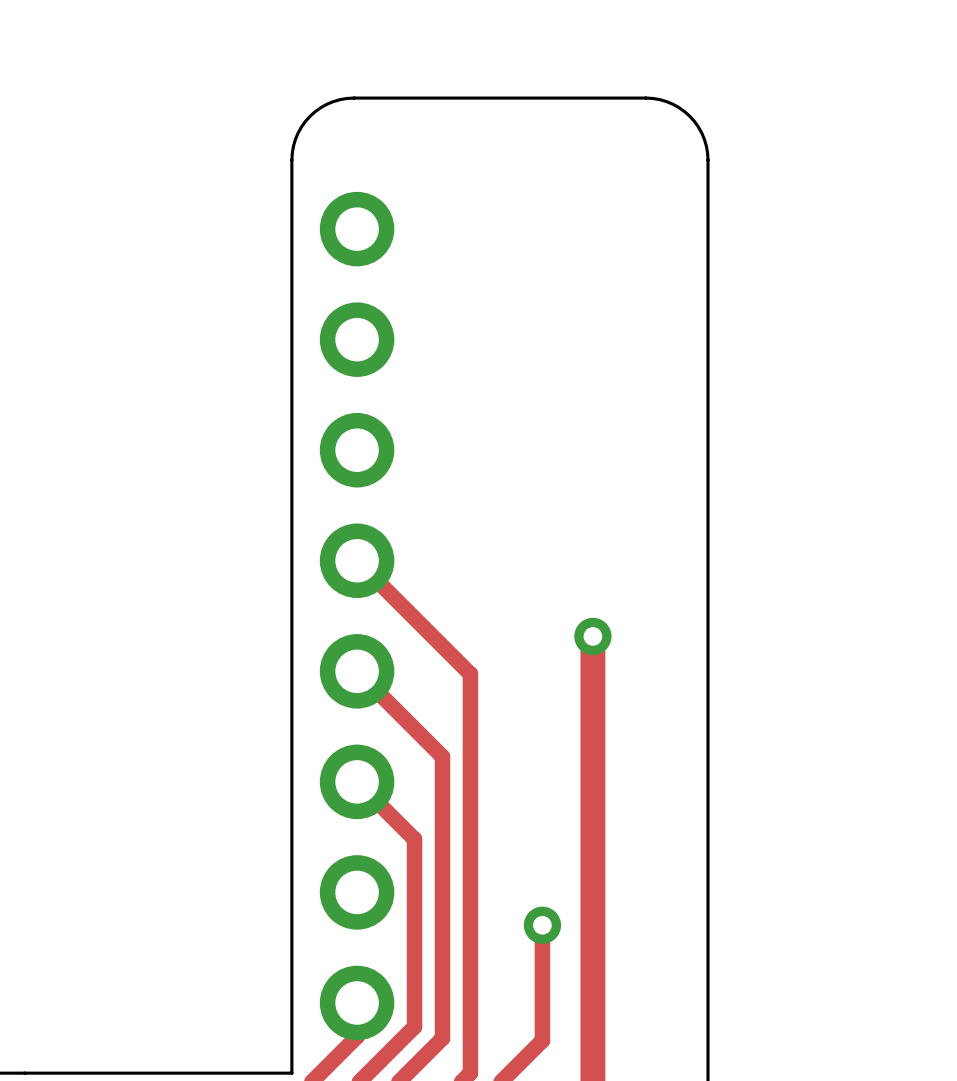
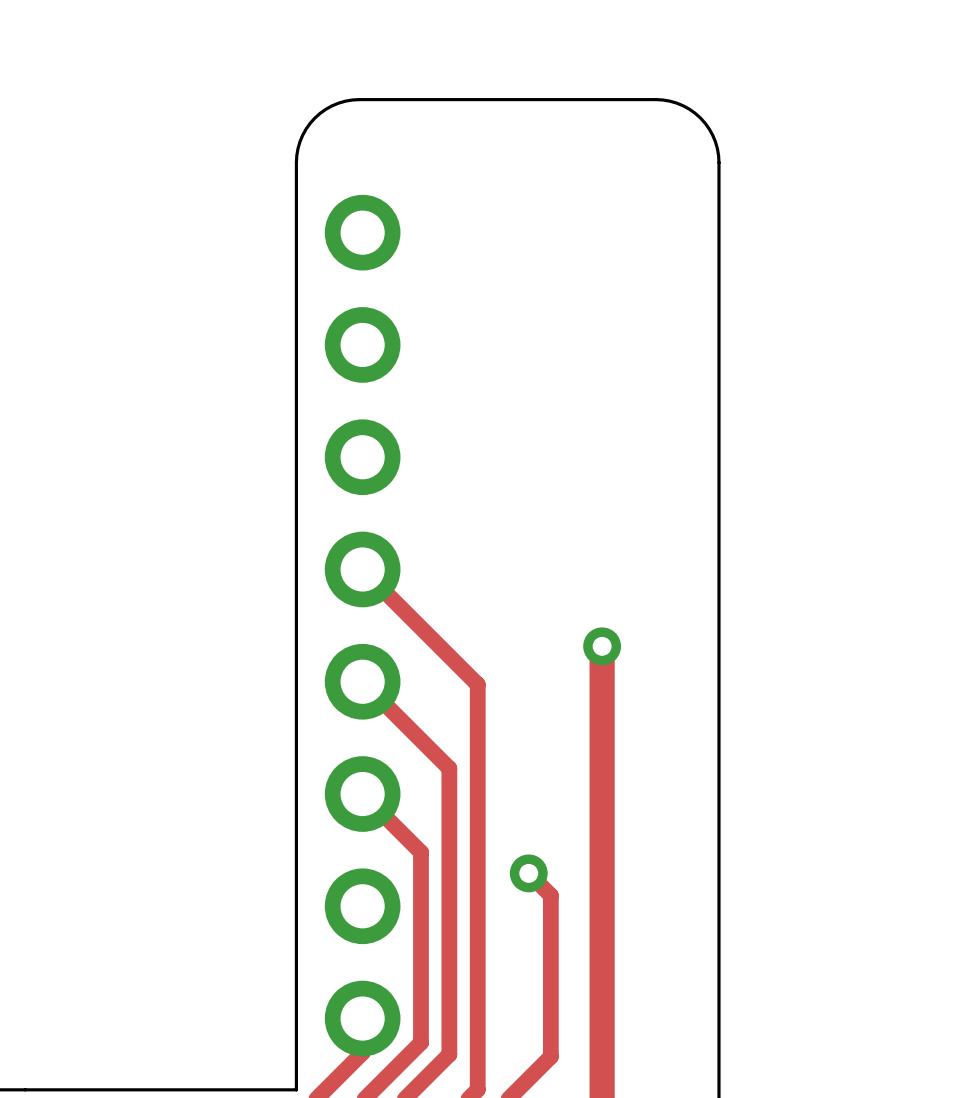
track: none -> (528, 873) (550, 895) (550, 939)
via position: (542, 925) -> (528, 873)

